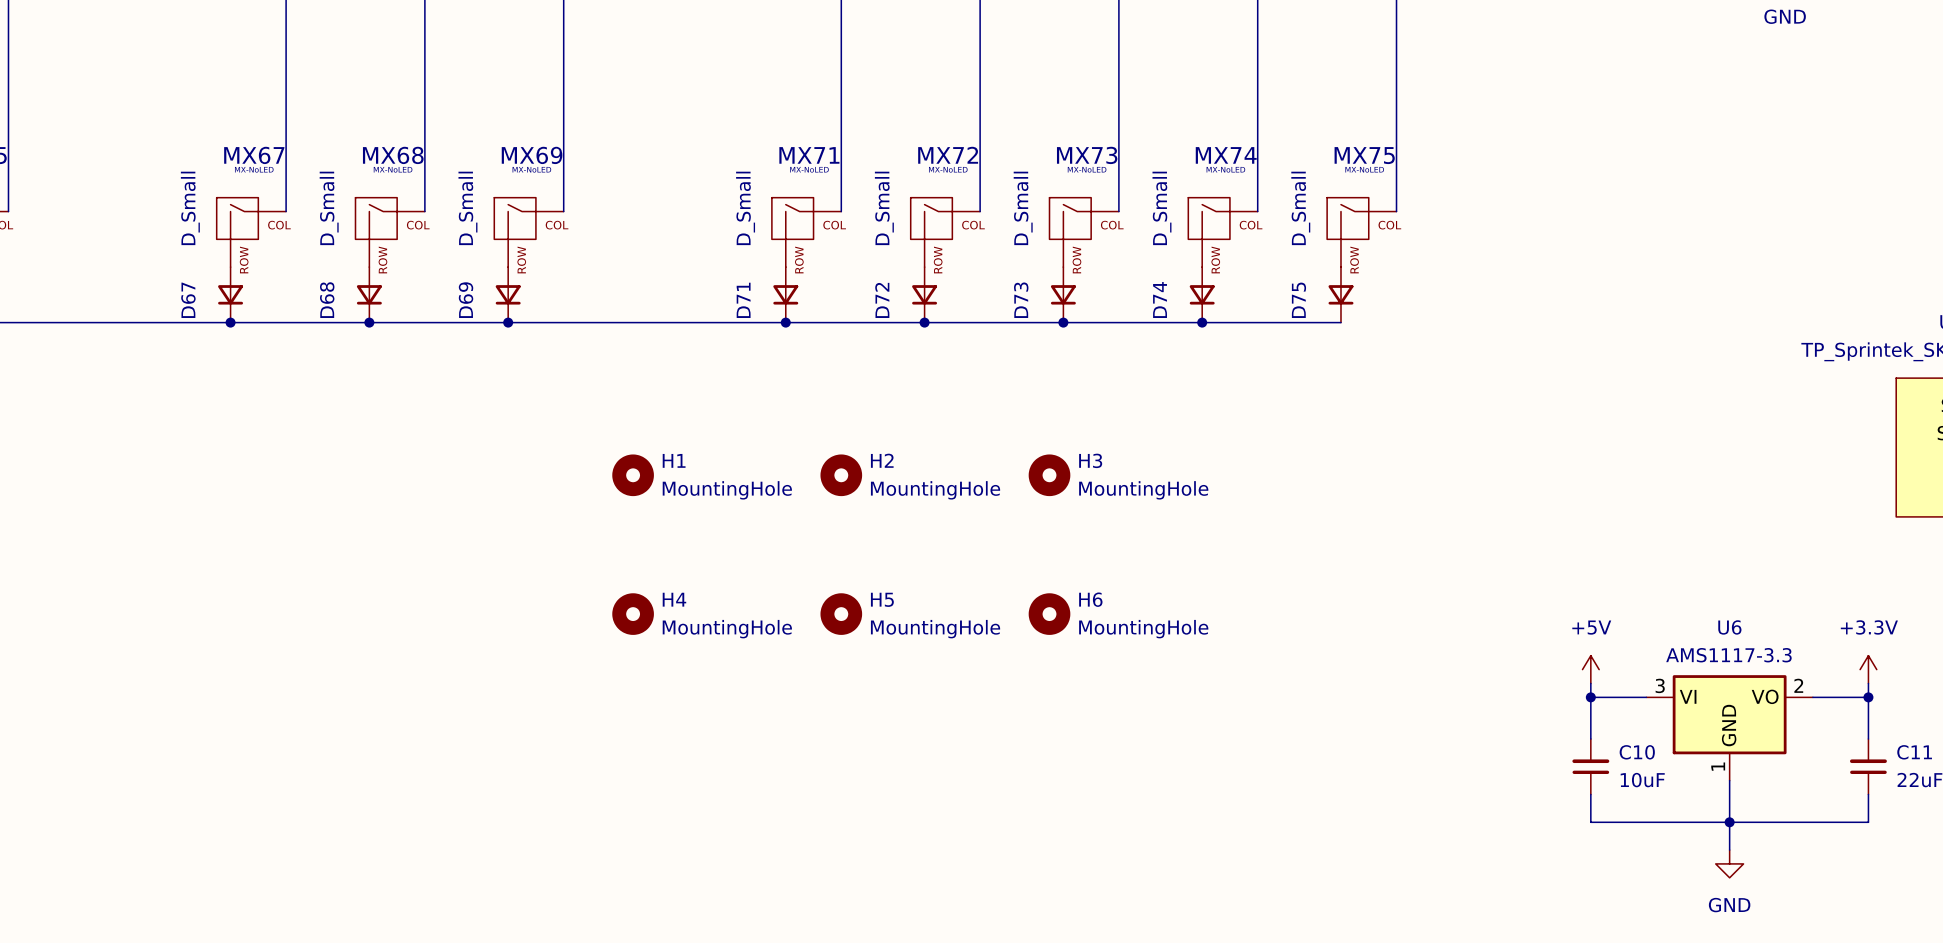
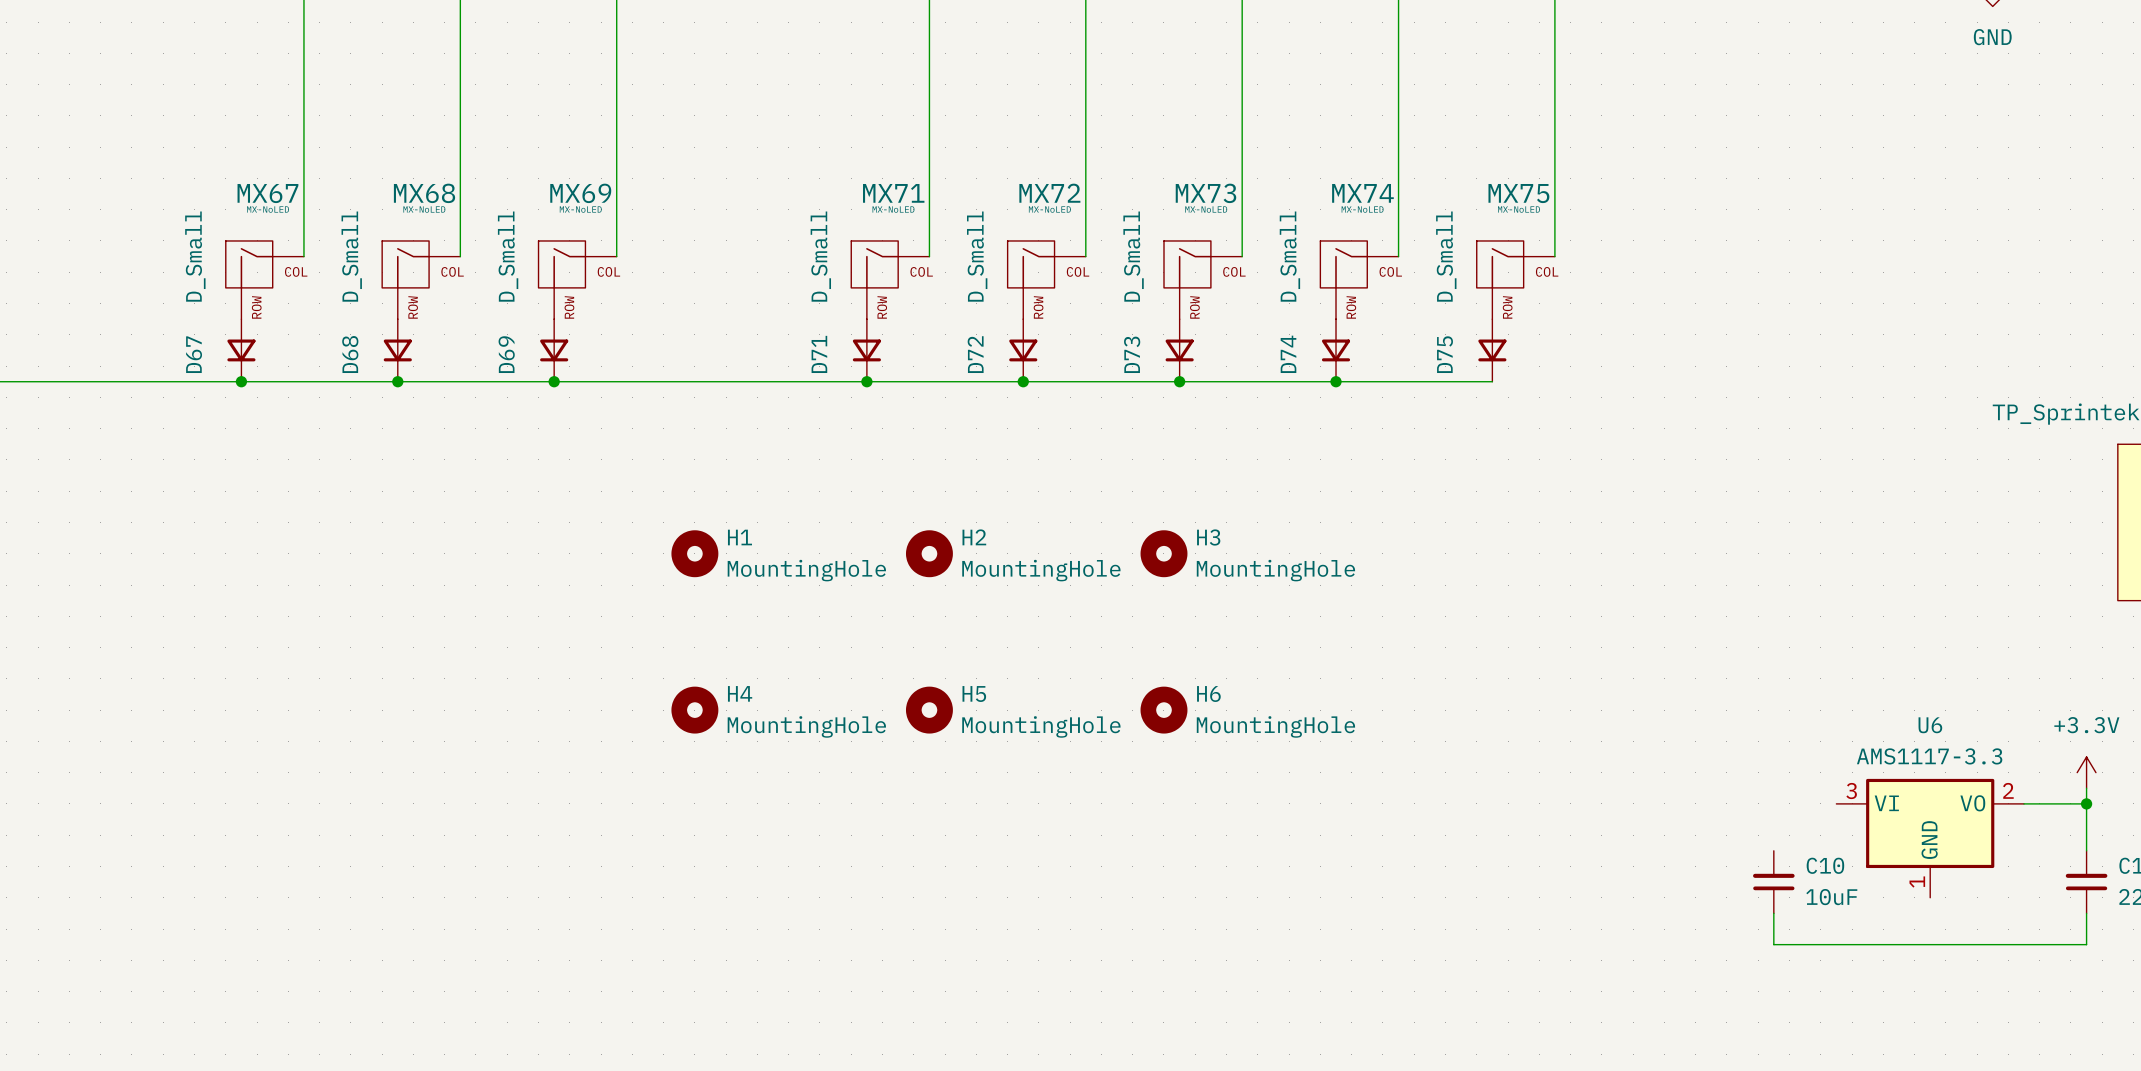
power symbol: +5V (1590, 669) -> none
wire: (1590, 683) (1590, 739) -> none
wire: (1590, 697) (1646, 697) -> none
junction: (1590, 697) -> none
wire: (1729, 780) (1729, 850) -> none
junction: (1729, 822) -> none
power symbol: GND (1729, 863) -> none

